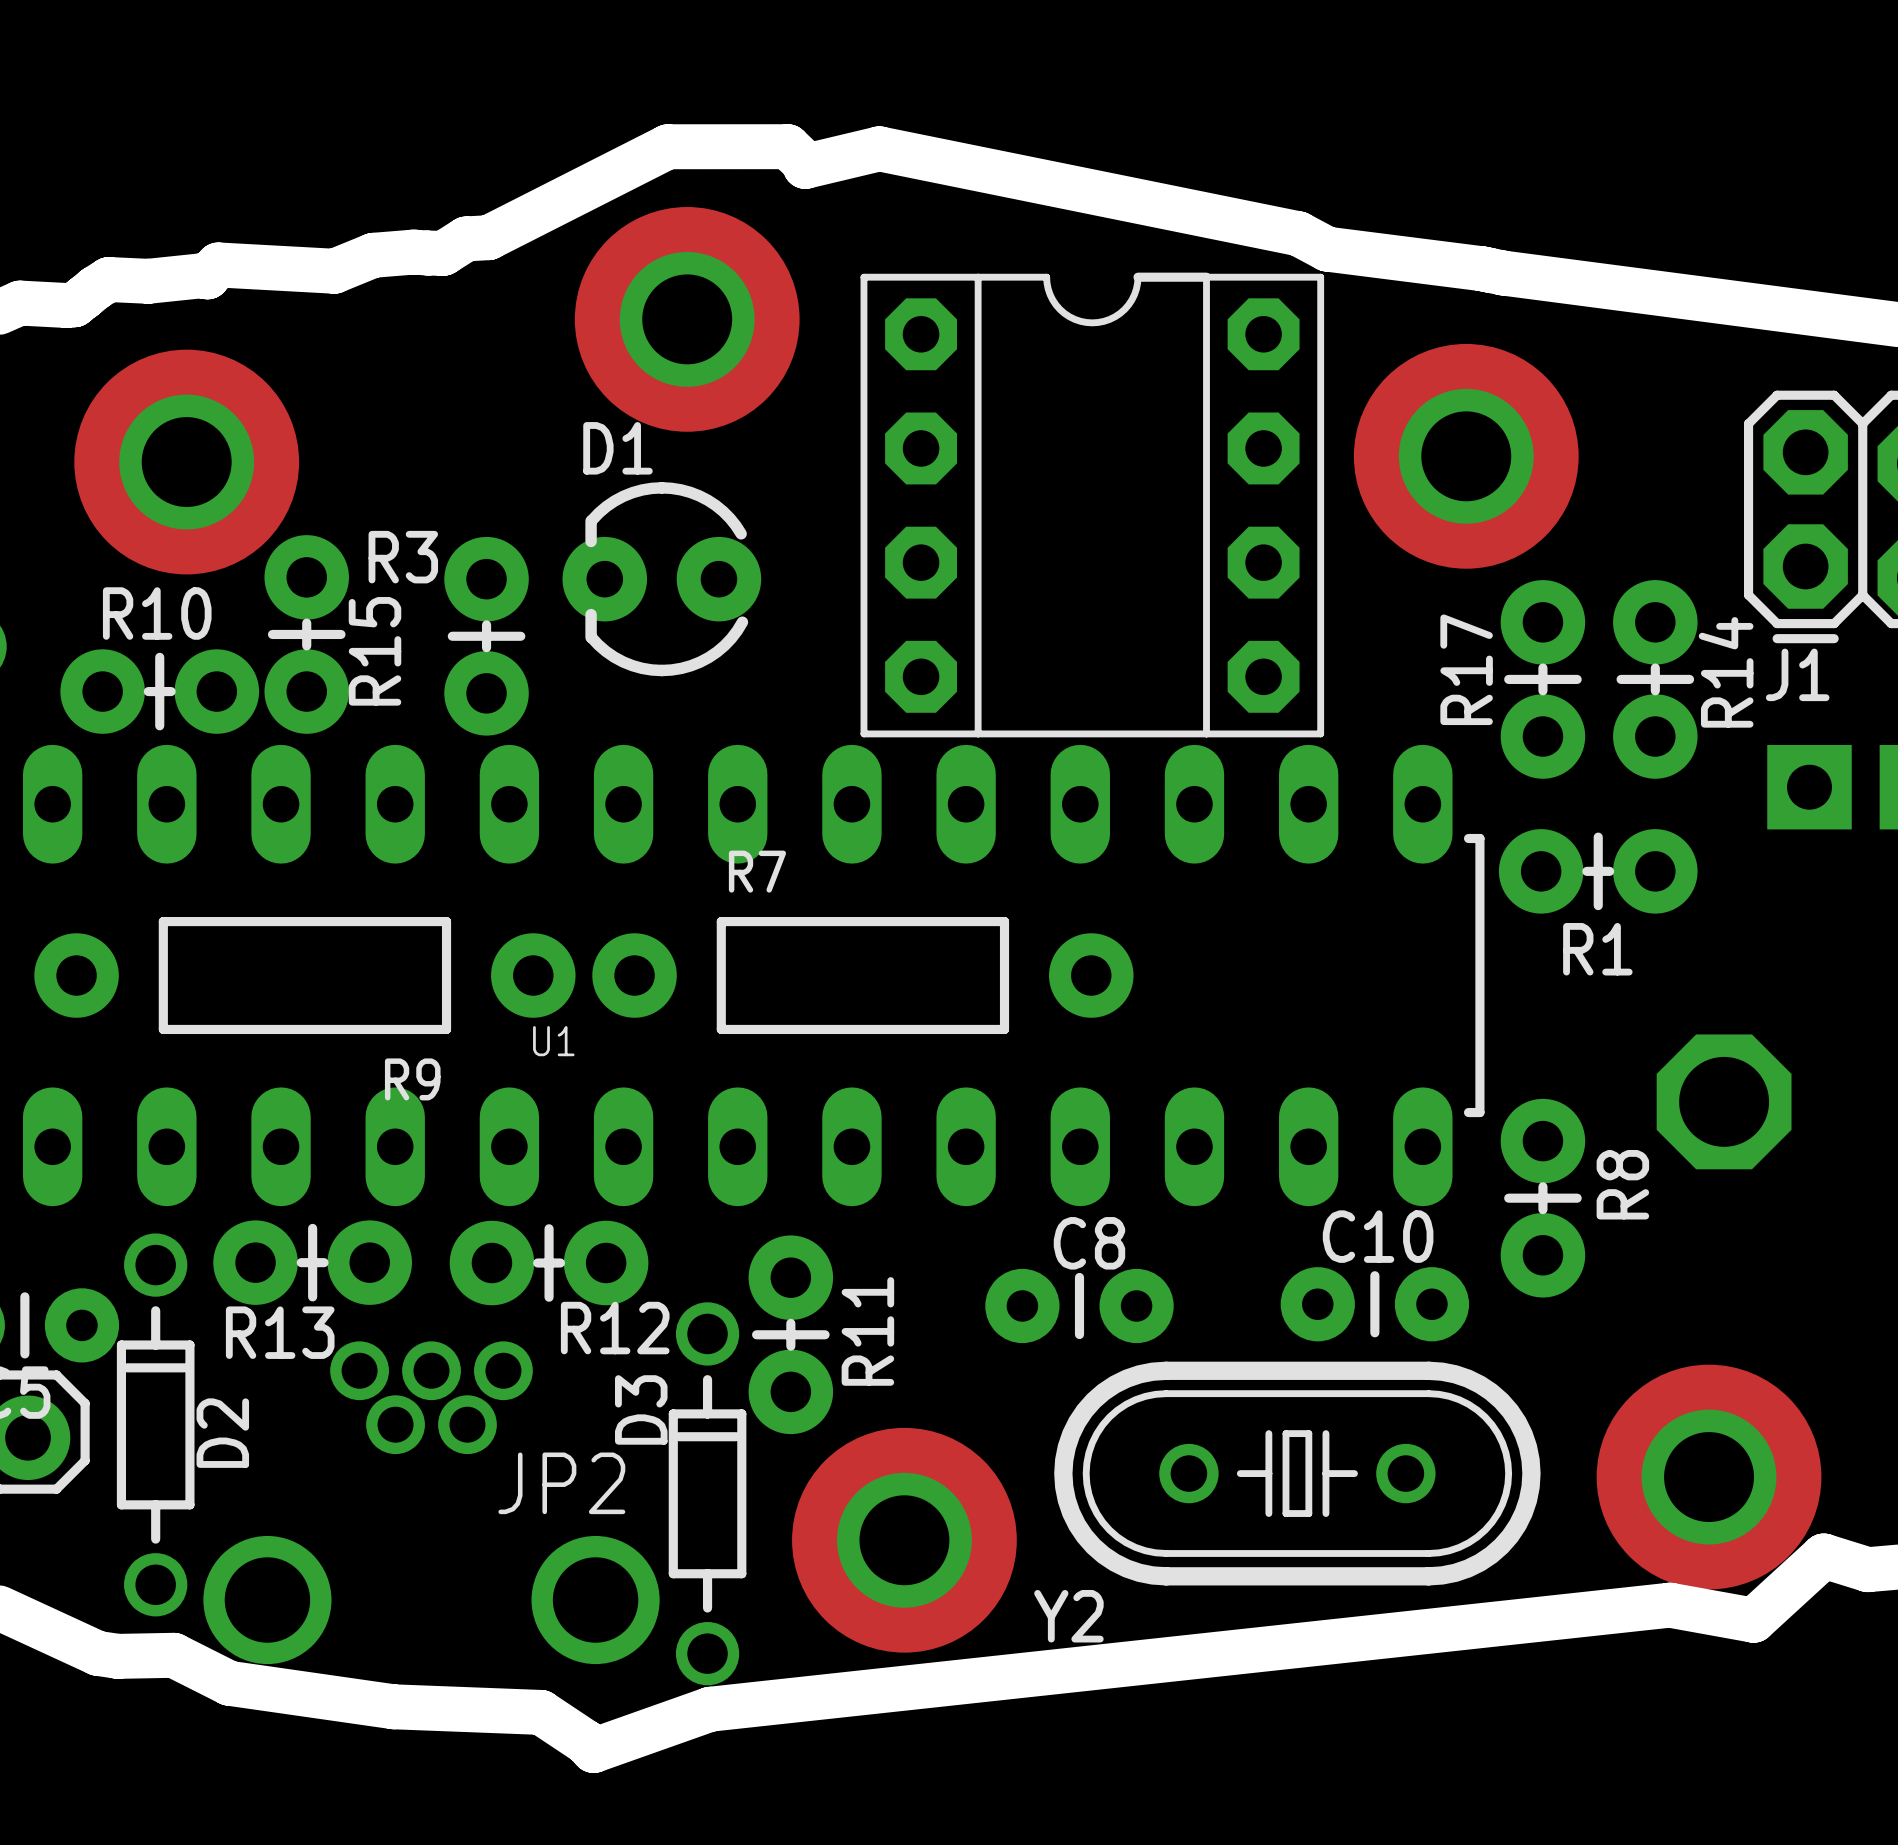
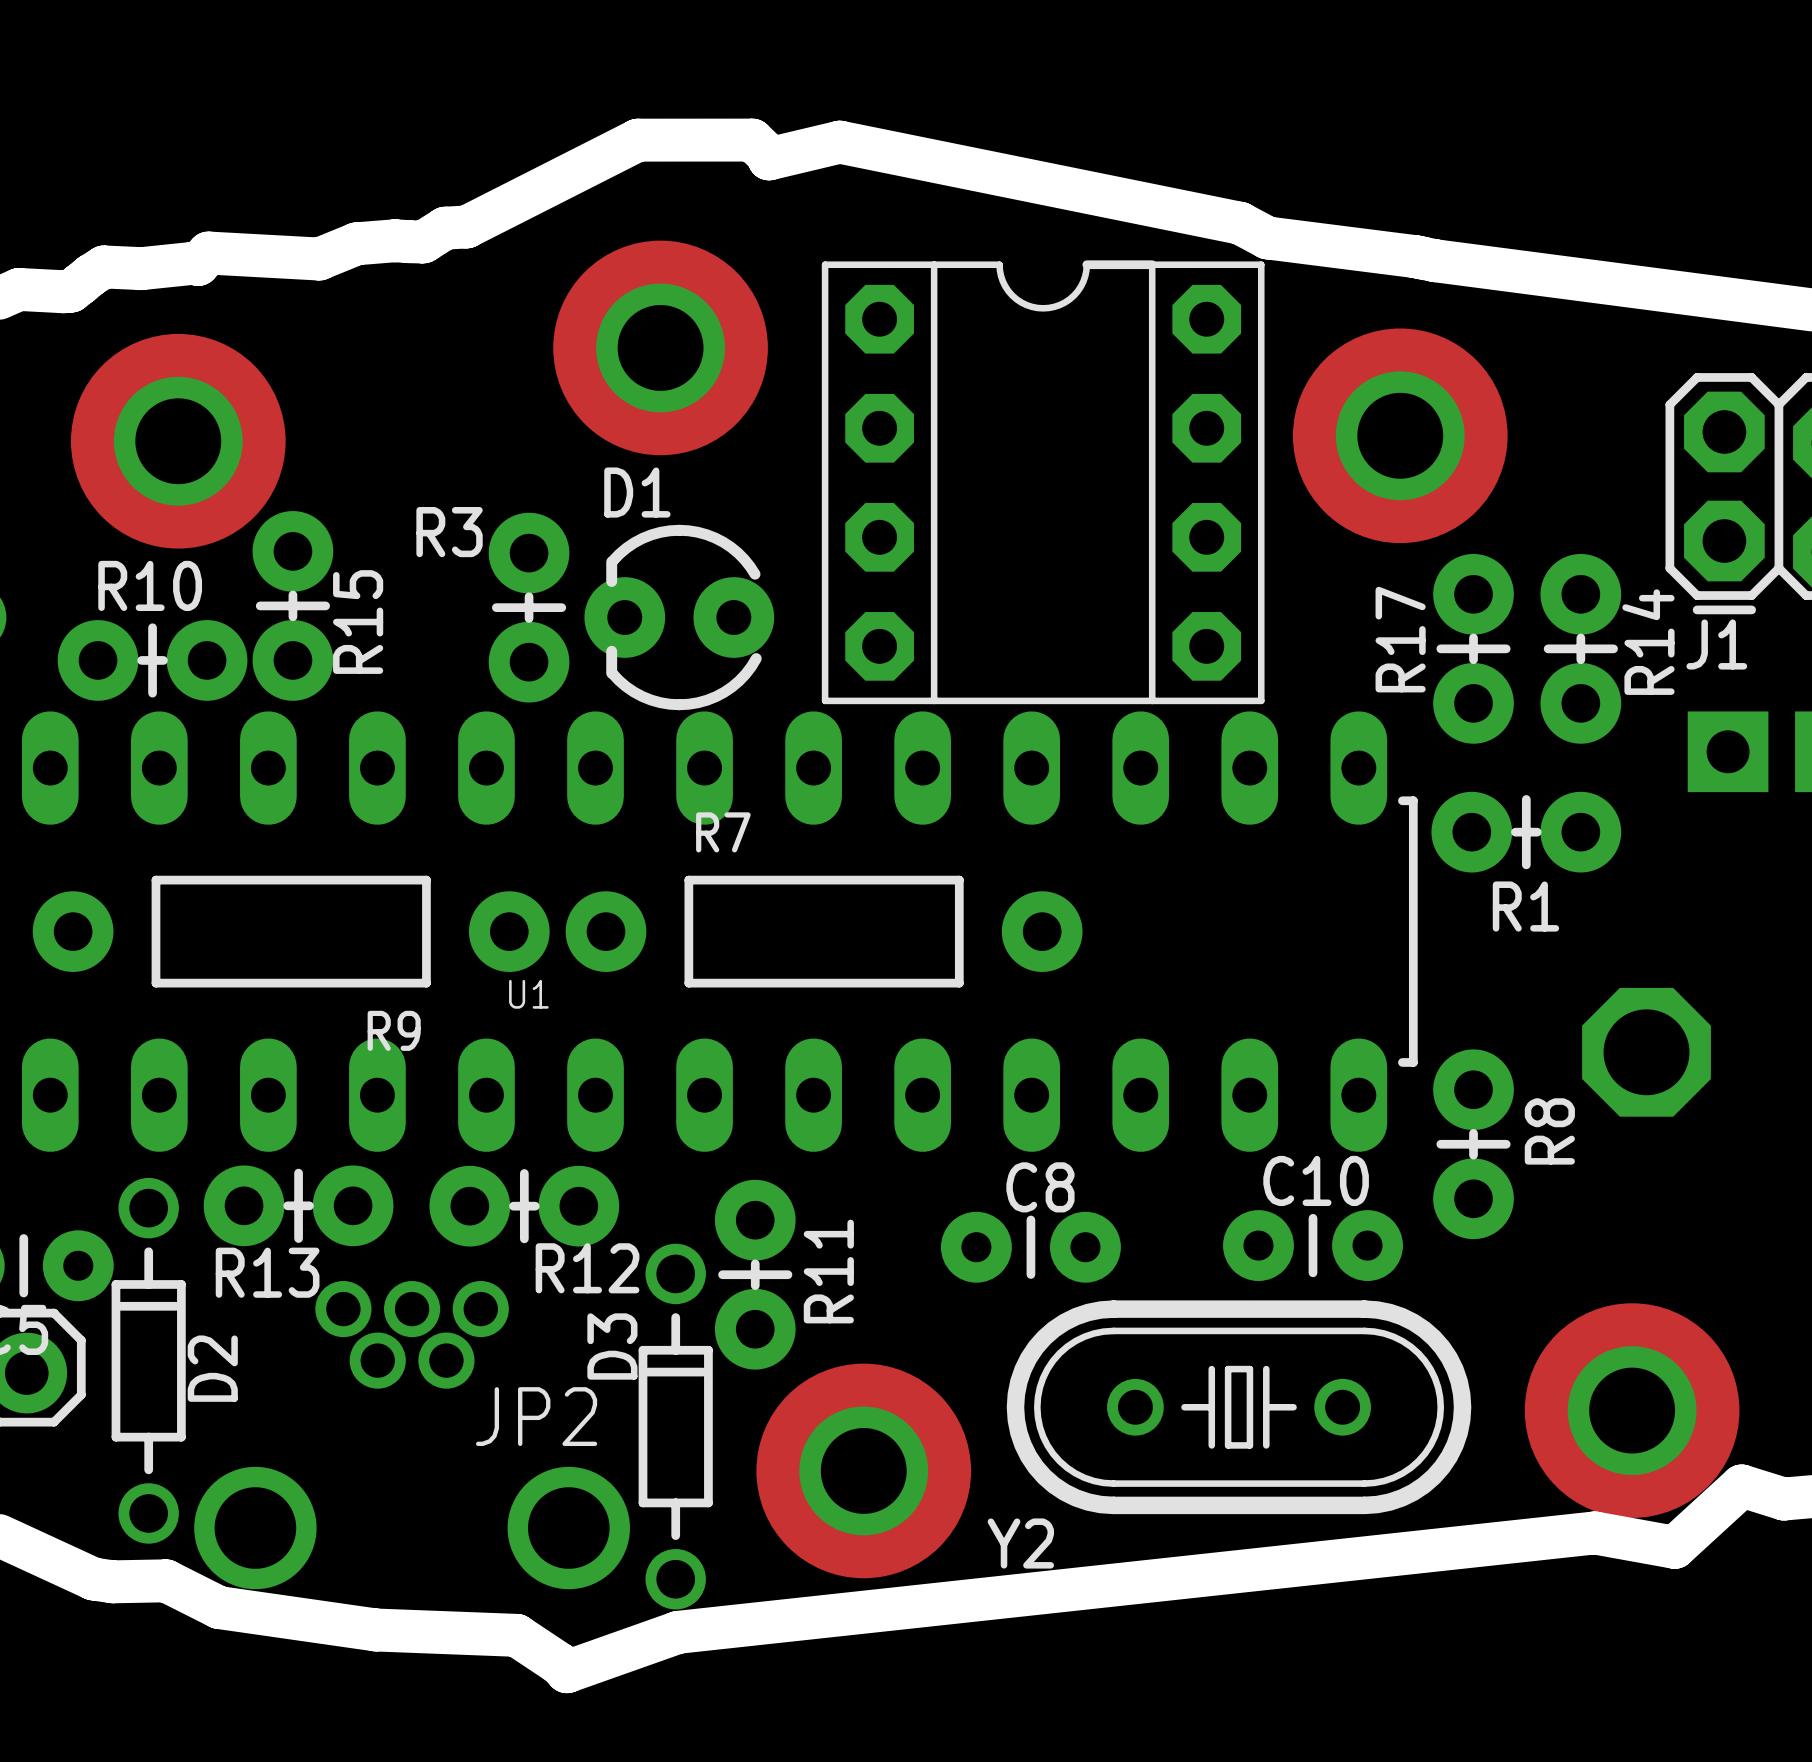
part position: (687, 319) -> (660, 347)
D1 position: (661, 579) -> (679, 617)
R3 position: (486, 636) -> (529, 607)

